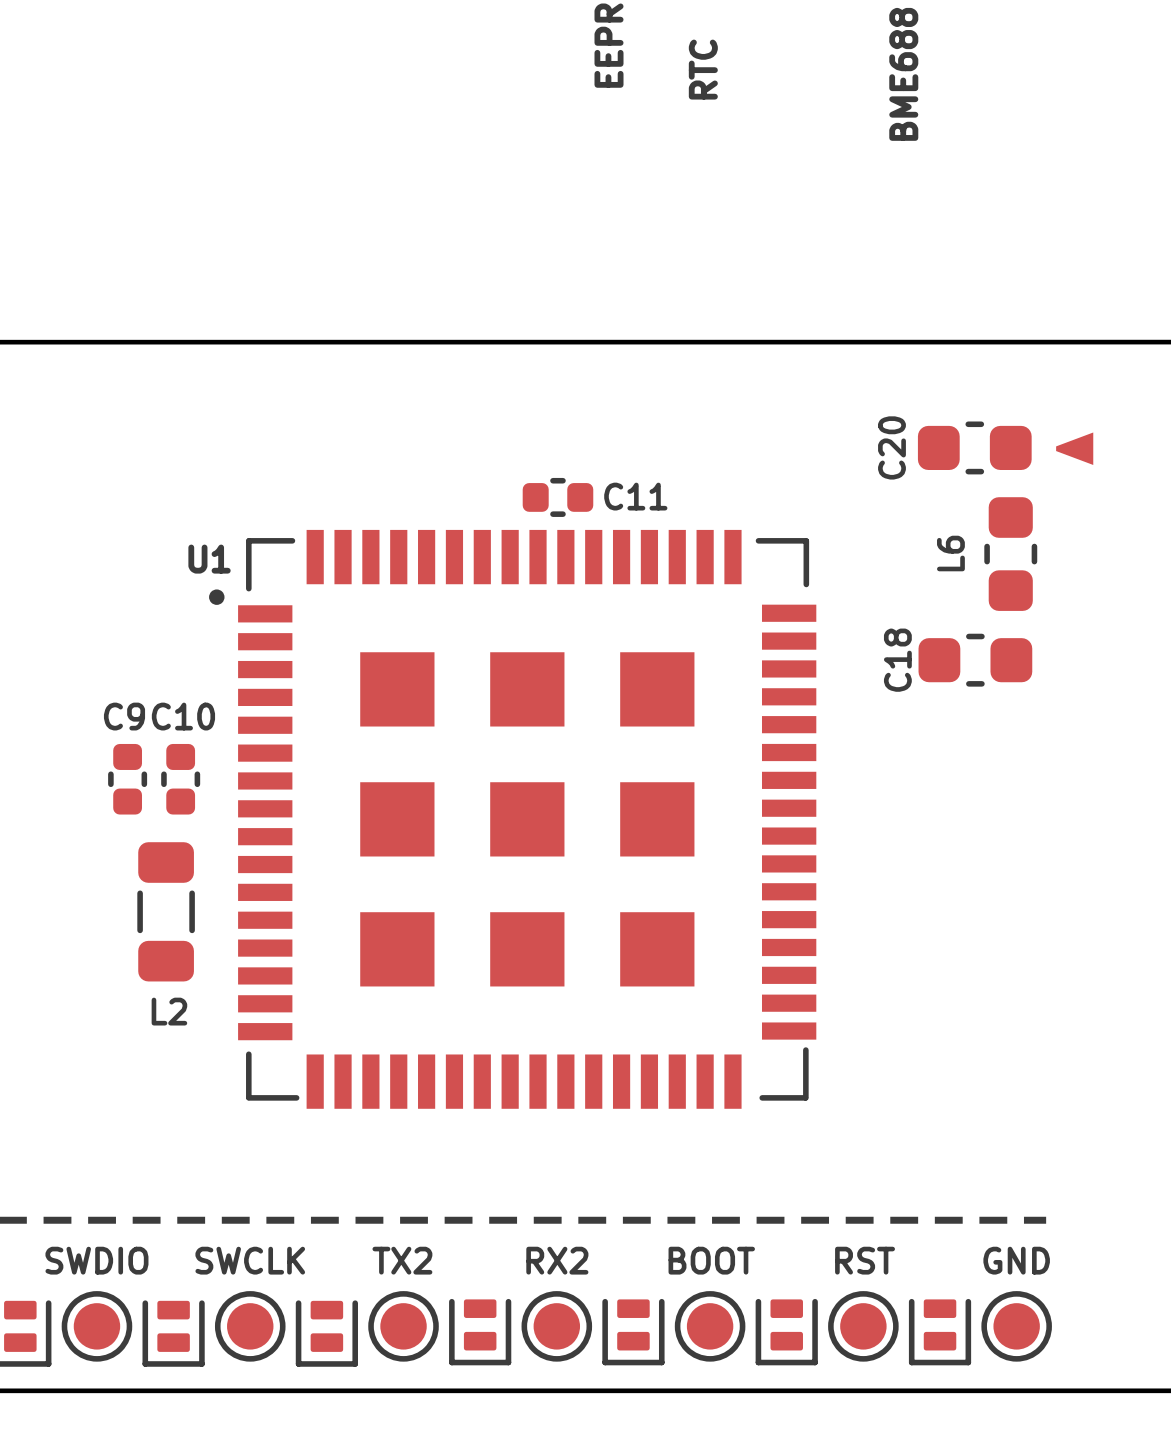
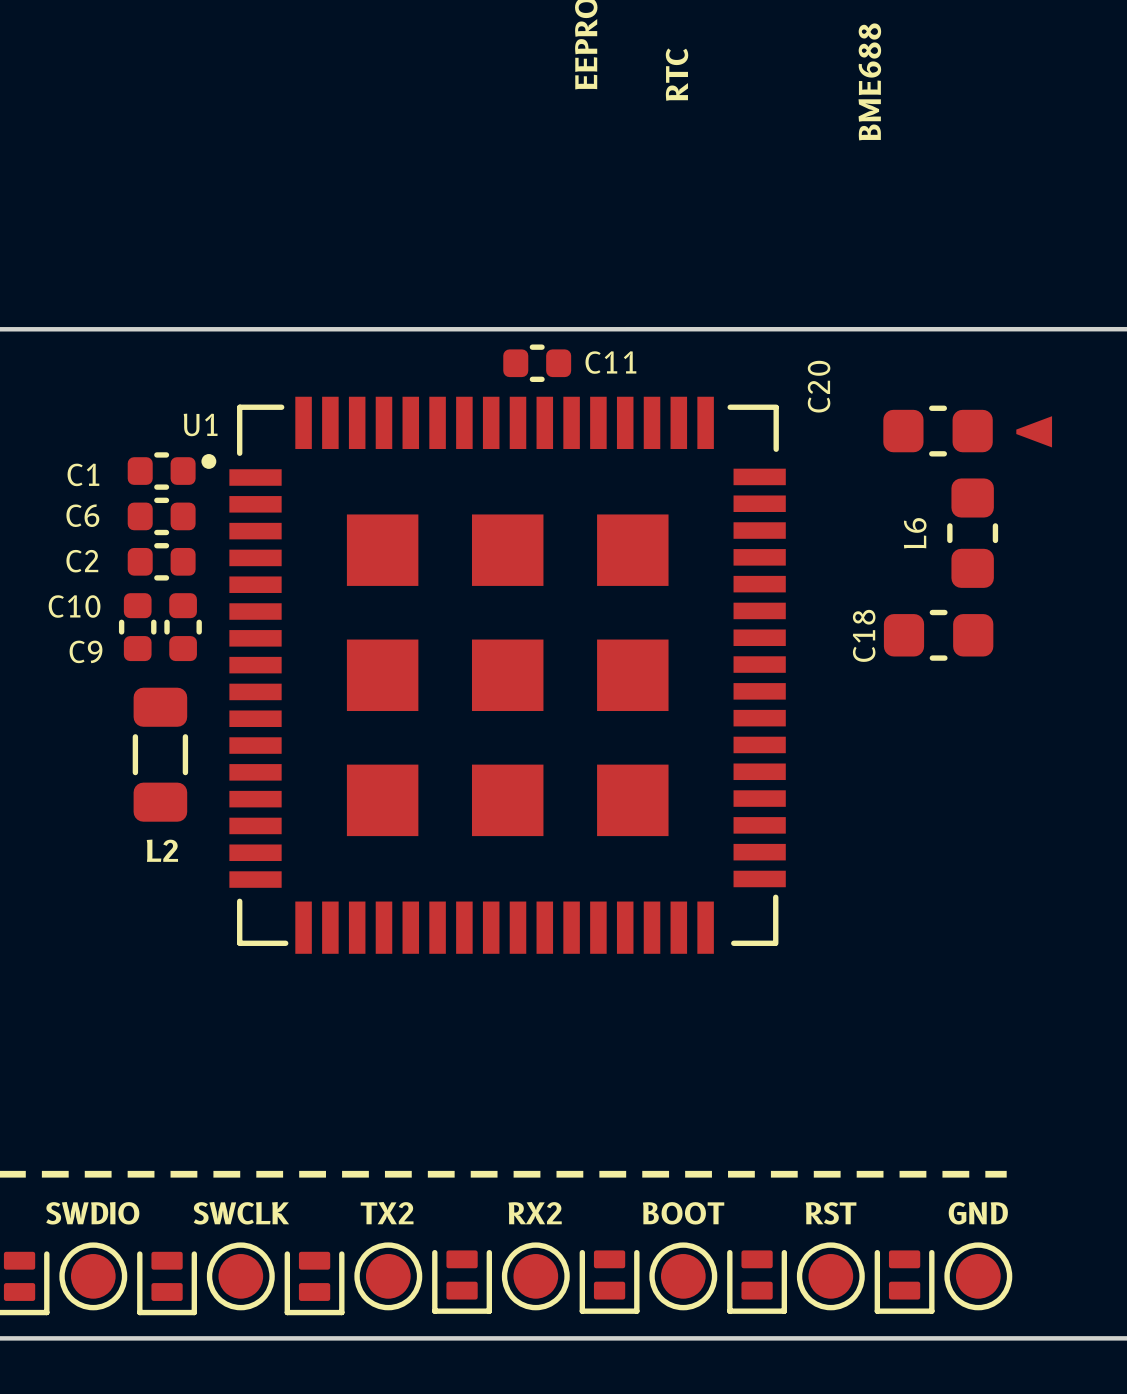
C20 name position: C20 (891, 447) -> C20 (819, 386)
C1: none -> (161, 471)
C11 position: (557, 497) -> (537, 363)
C6: none -> (161, 516)
C2: none -> (161, 561)
C9 name position: C9 (124, 716) -> C9 (85, 651)
C10 name position: C10 (183, 716) -> C10 (74, 606)
C9 position: (127, 779) -> (137, 627)
C10 position: (180, 779) -> (183, 627)
U1 position: (512, 819) -> (493, 675)
L2 position: (166, 911) -> (160, 754)

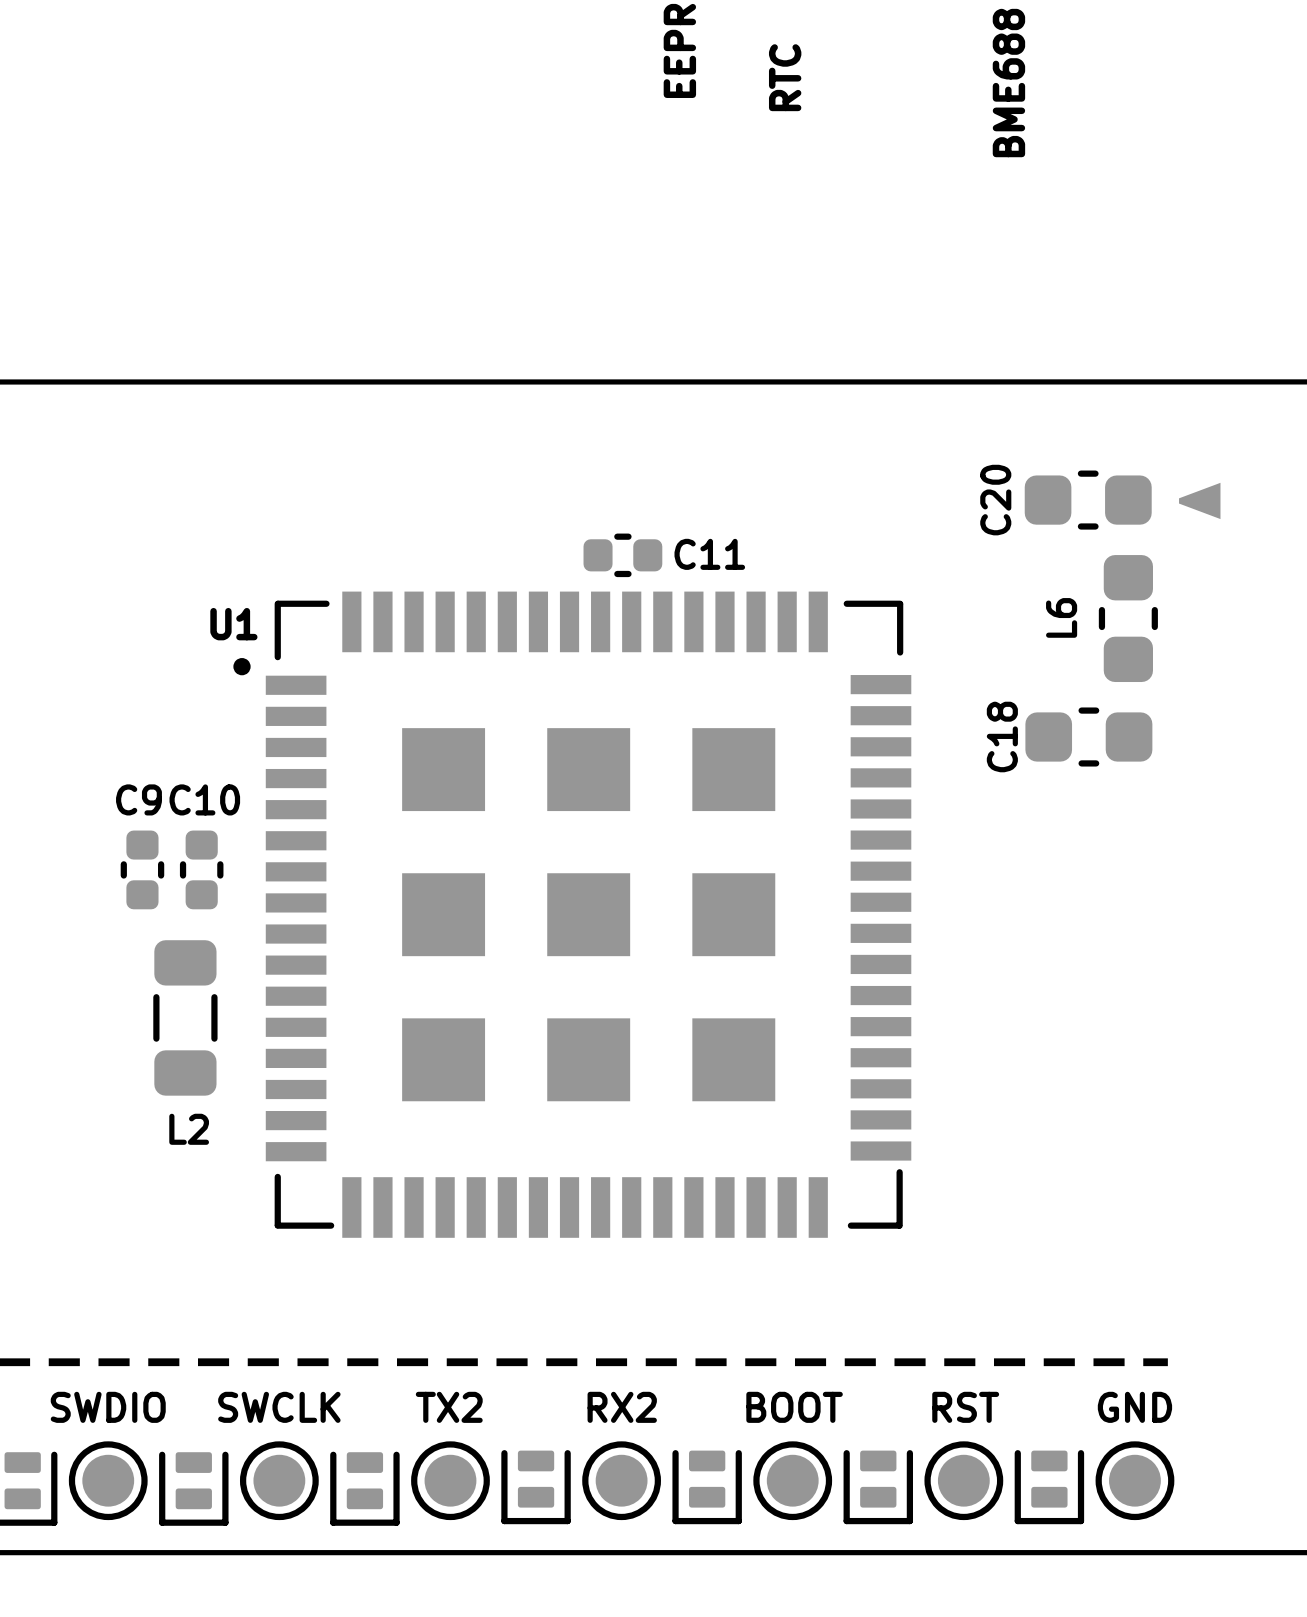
C11 position: (537, 363) -> (622, 555)
C20 name position: C20 (819, 386) -> C20 (995, 500)
C1: (161, 471) -> none
C6: (161, 516) -> none
C2: (161, 561) -> none
C10 name position: C10 (74, 606) -> C10 (204, 799)
C9 position: (137, 627) -> (142, 869)
C10 position: (183, 627) -> (201, 869)
C9 name position: C9 (85, 651) -> C9 (138, 799)
U1 position: (493, 675) -> (572, 914)
L2 position: (160, 754) -> (185, 1017)

